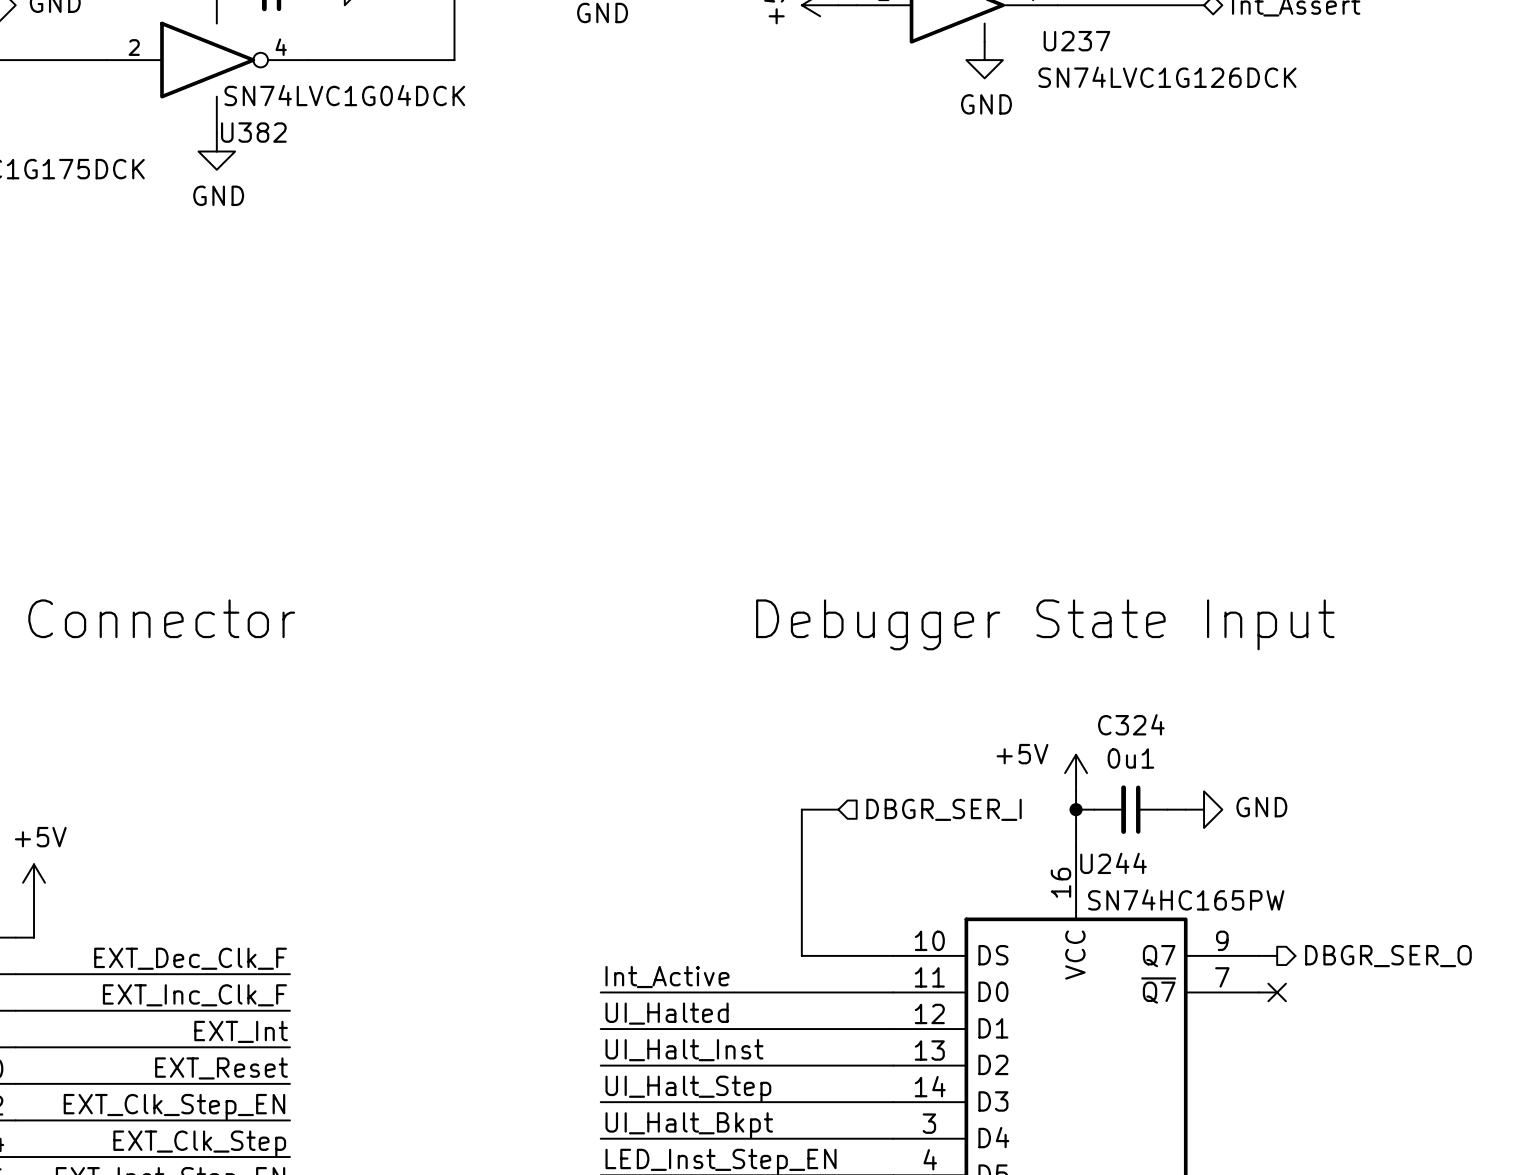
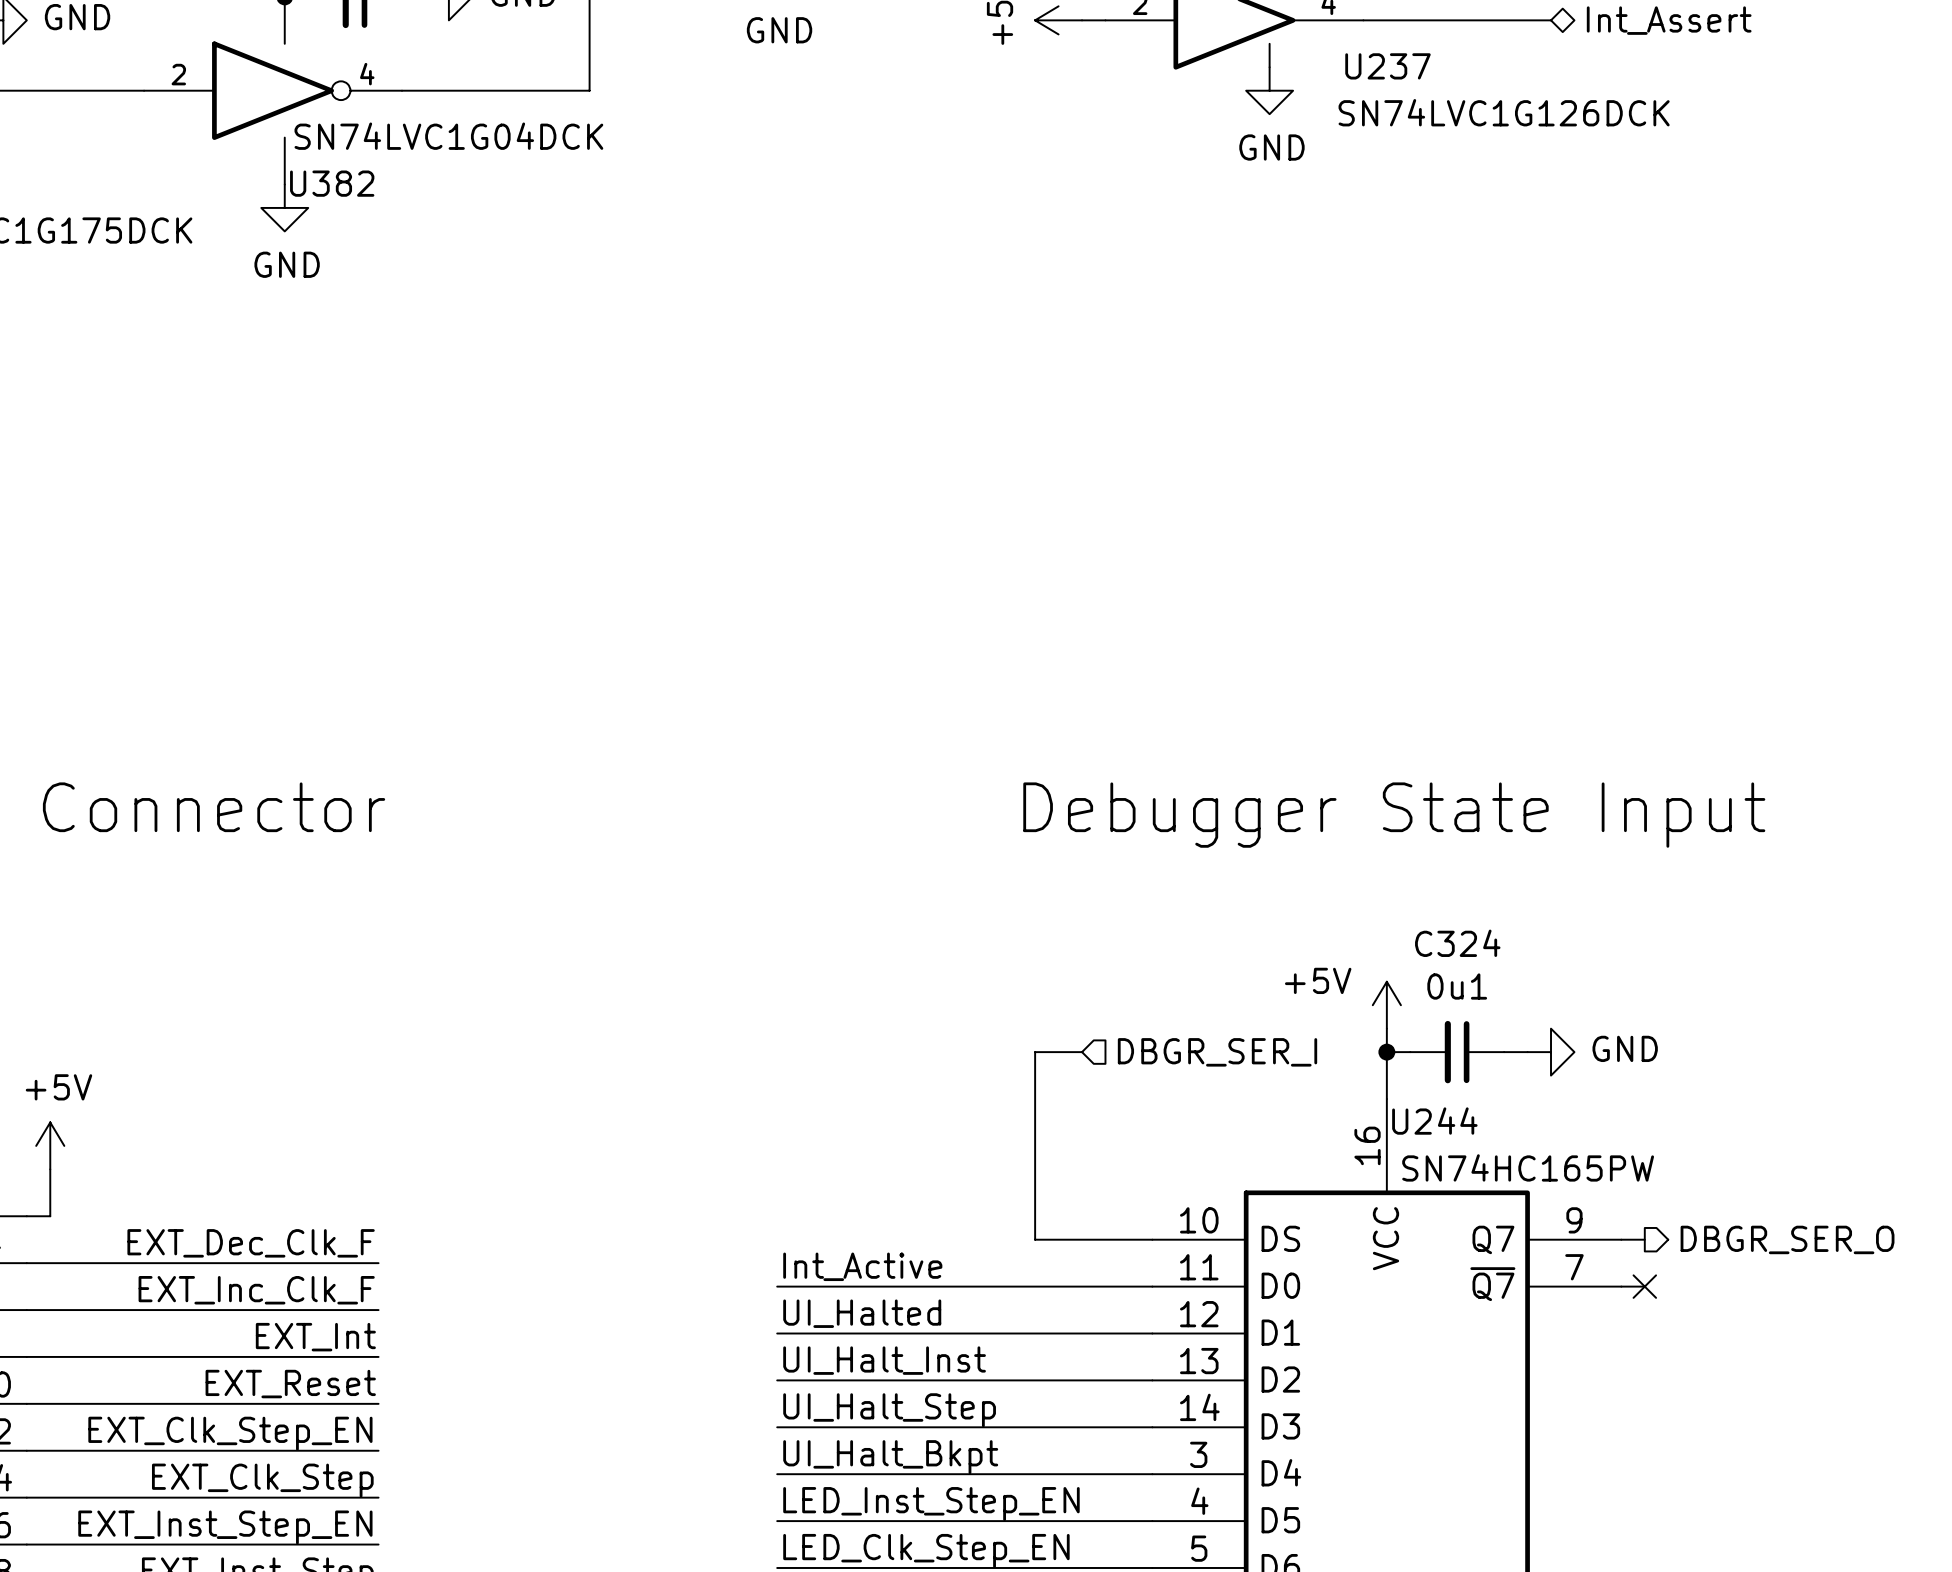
text position: Debugger State Input (1045, 624) -> Debugger State Input (1394, 815)

